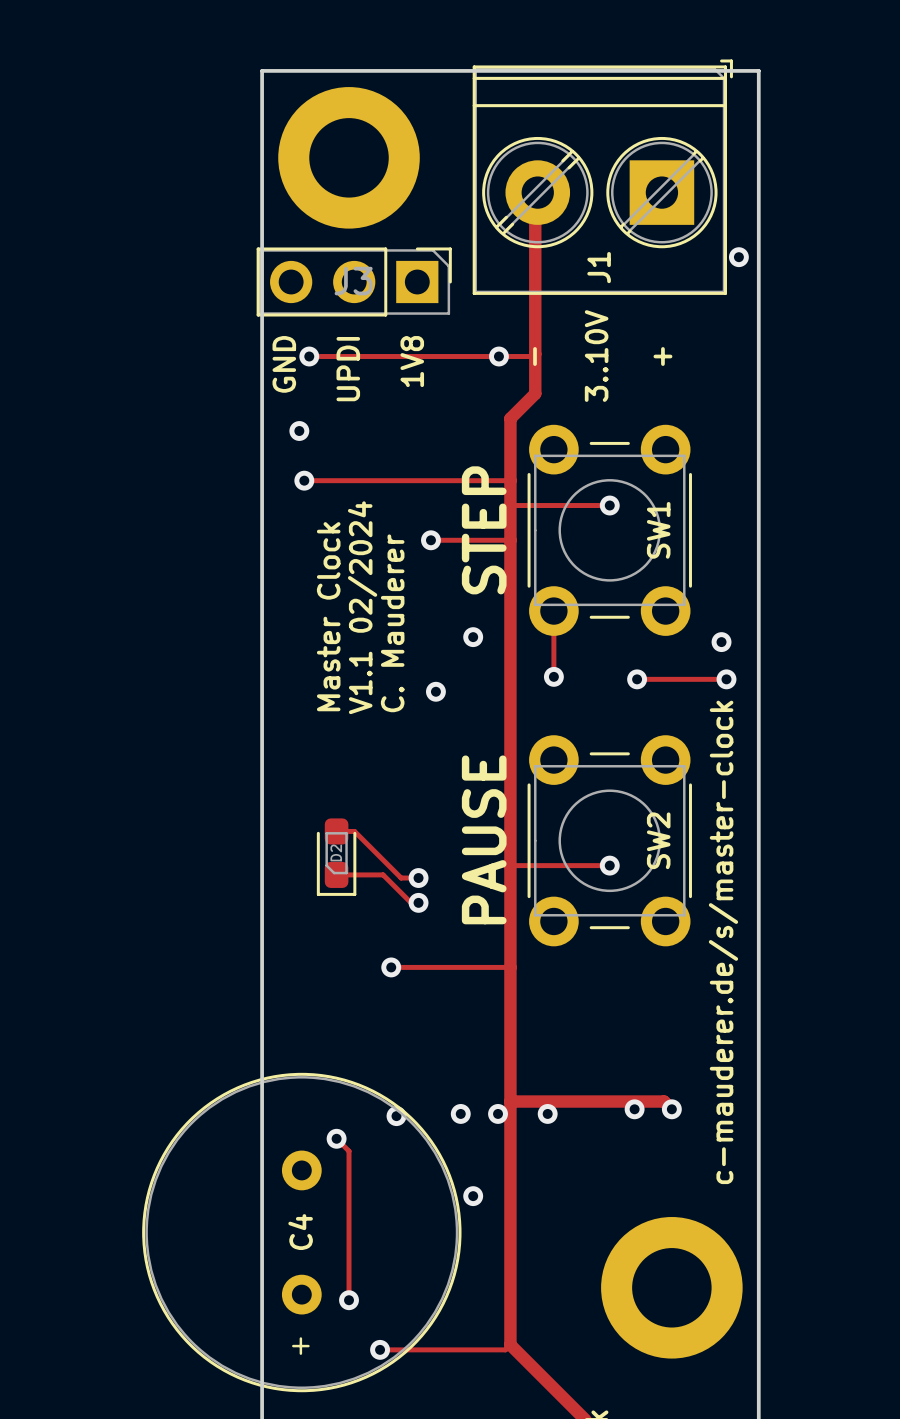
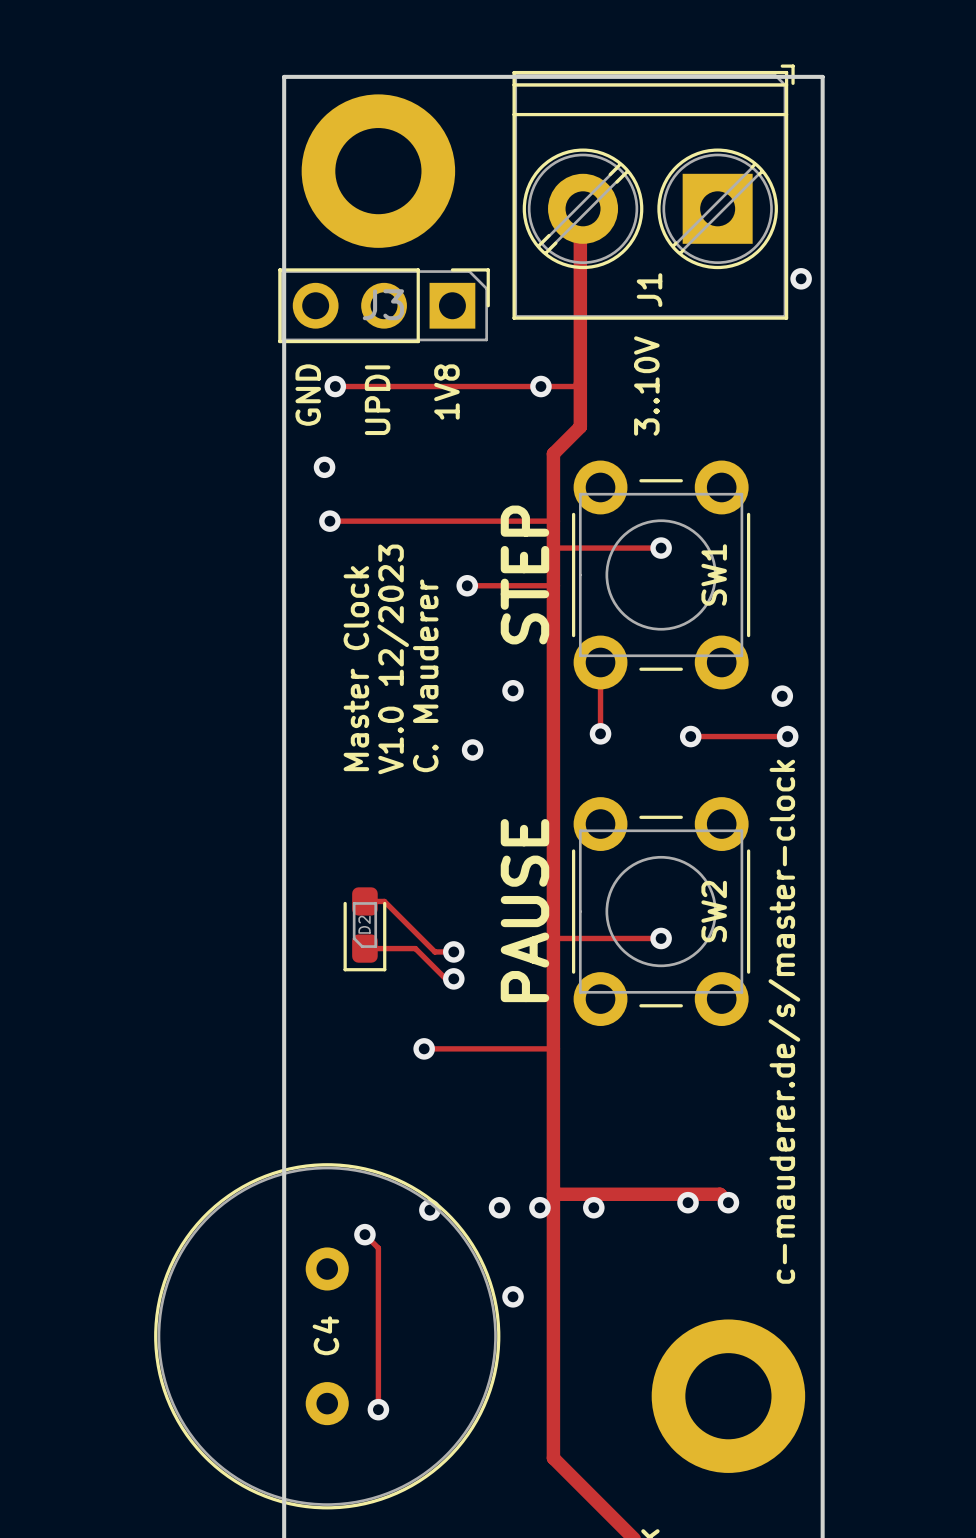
text: - (535, 356) -> none
text: + (662, 356) -> none
text: V1.1 02/2024 (362, 607) -> V1.0 12/2023 (393, 659)
track: (510, 1344) (505, 1349) (380, 1349) -> none
text: + (300, 1346) -> none
via: (380, 1349) -> none

